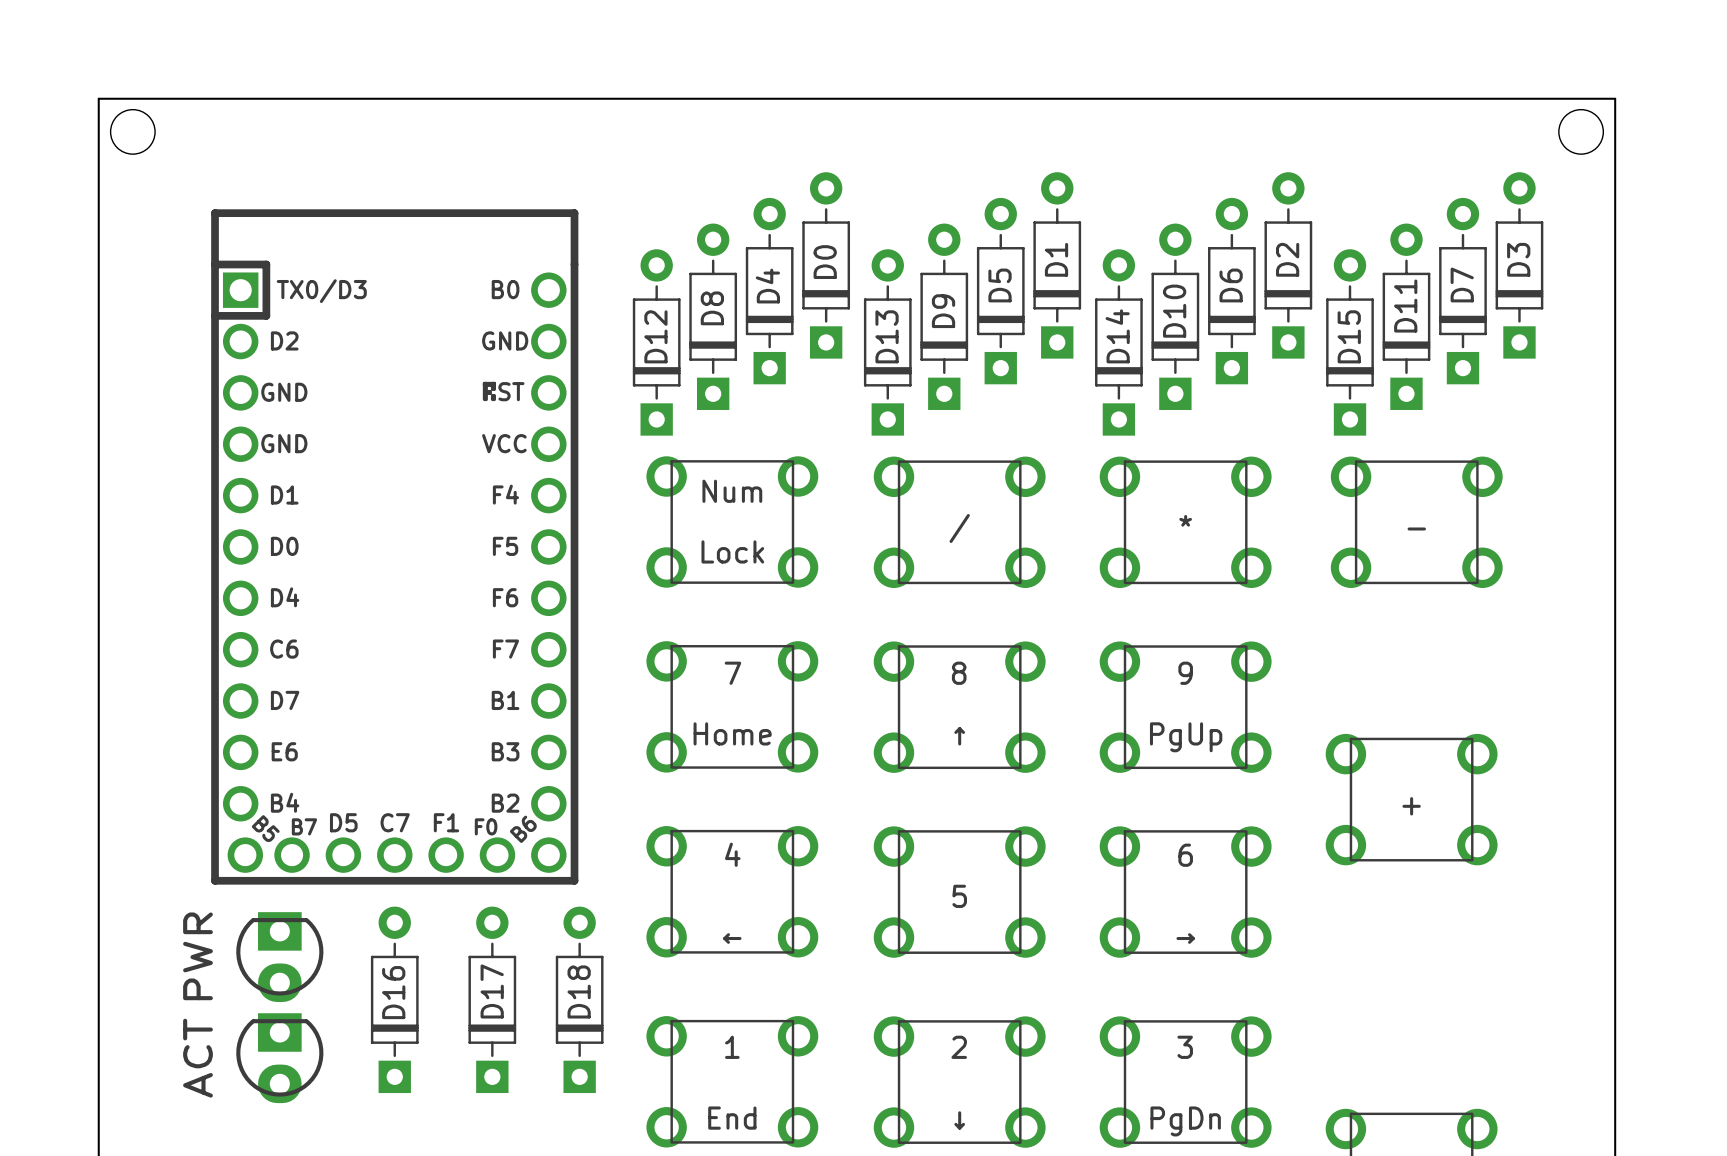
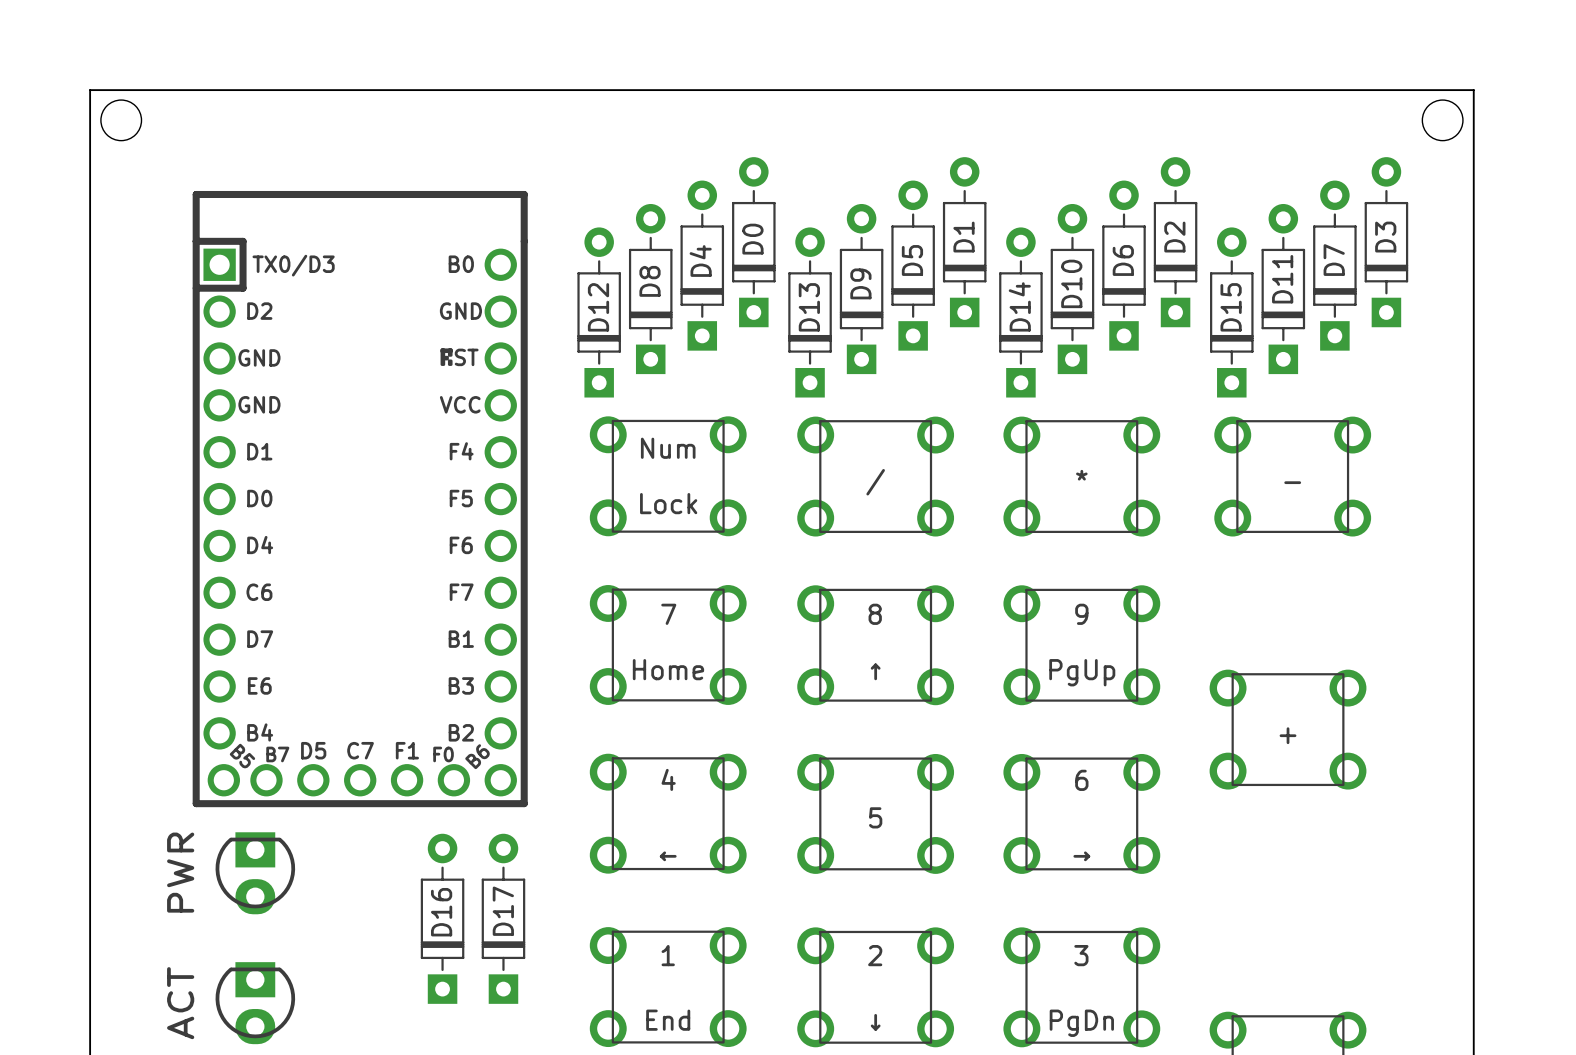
D16 position: (394, 999) -> (442, 918)
D17 position: (492, 999) -> (503, 918)
D18: (579, 999) -> none
ACT position: (279, 1058) -> (255, 1003)

